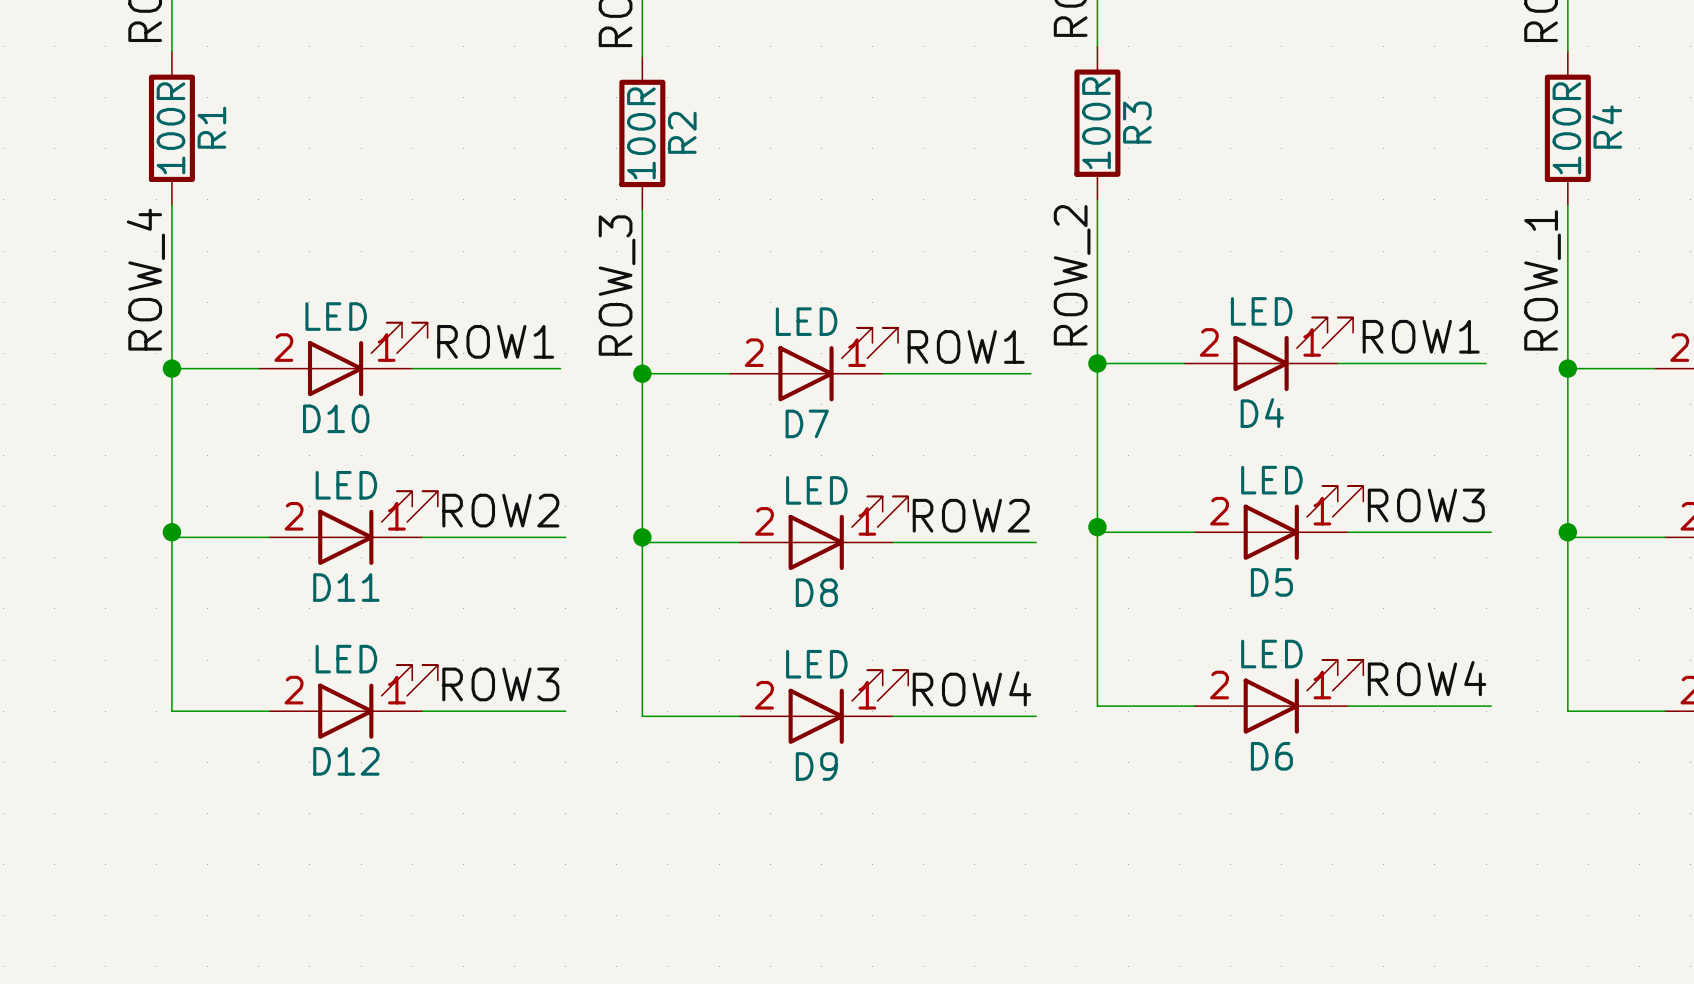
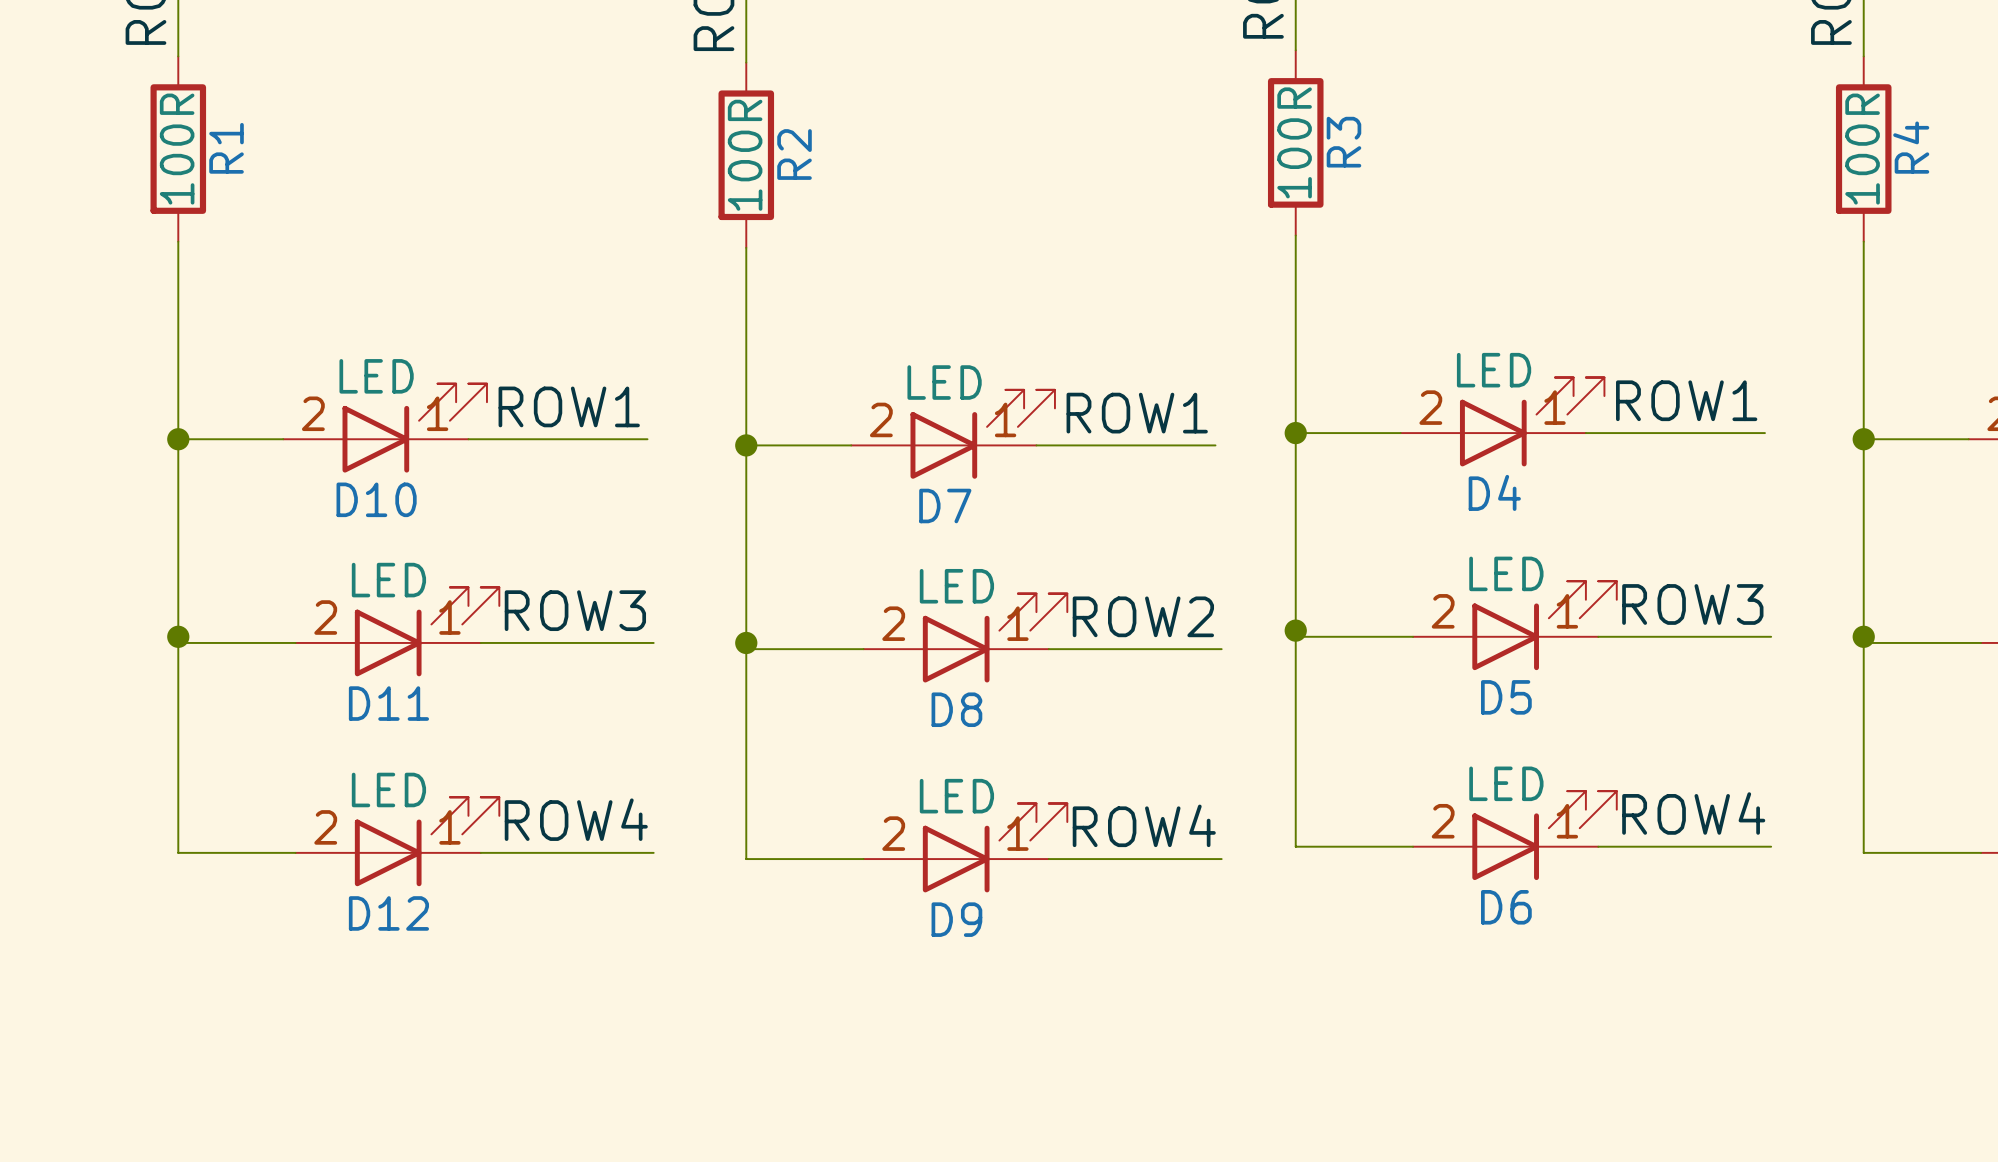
label: ROW_2 (1072, 275) -> none
label: ROW_4 (145, 279) -> none
label: ROW_1 (1542, 280) -> none
label: ROW_3 (617, 285) -> none
label: ROW2 (500, 510) -> ROW3 (575, 610)
label: ROW3 (500, 684) -> ROW4 (576, 819)

